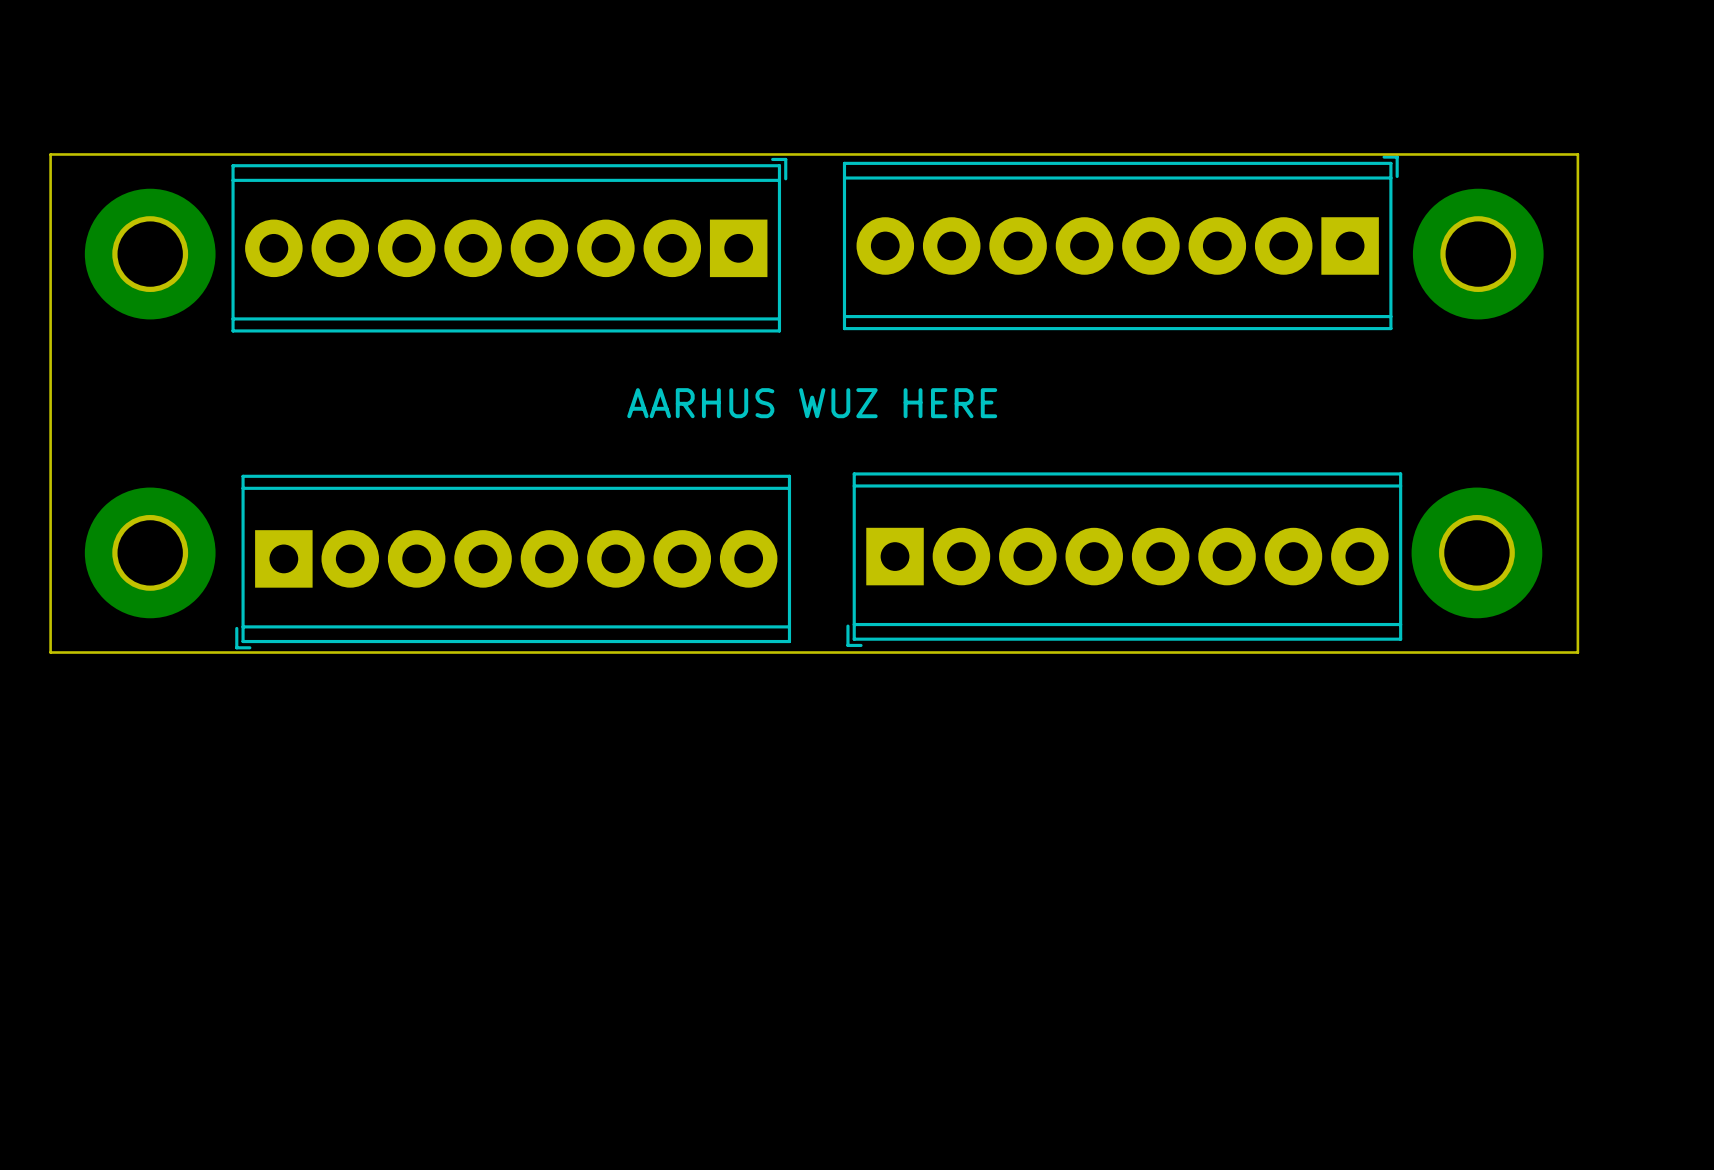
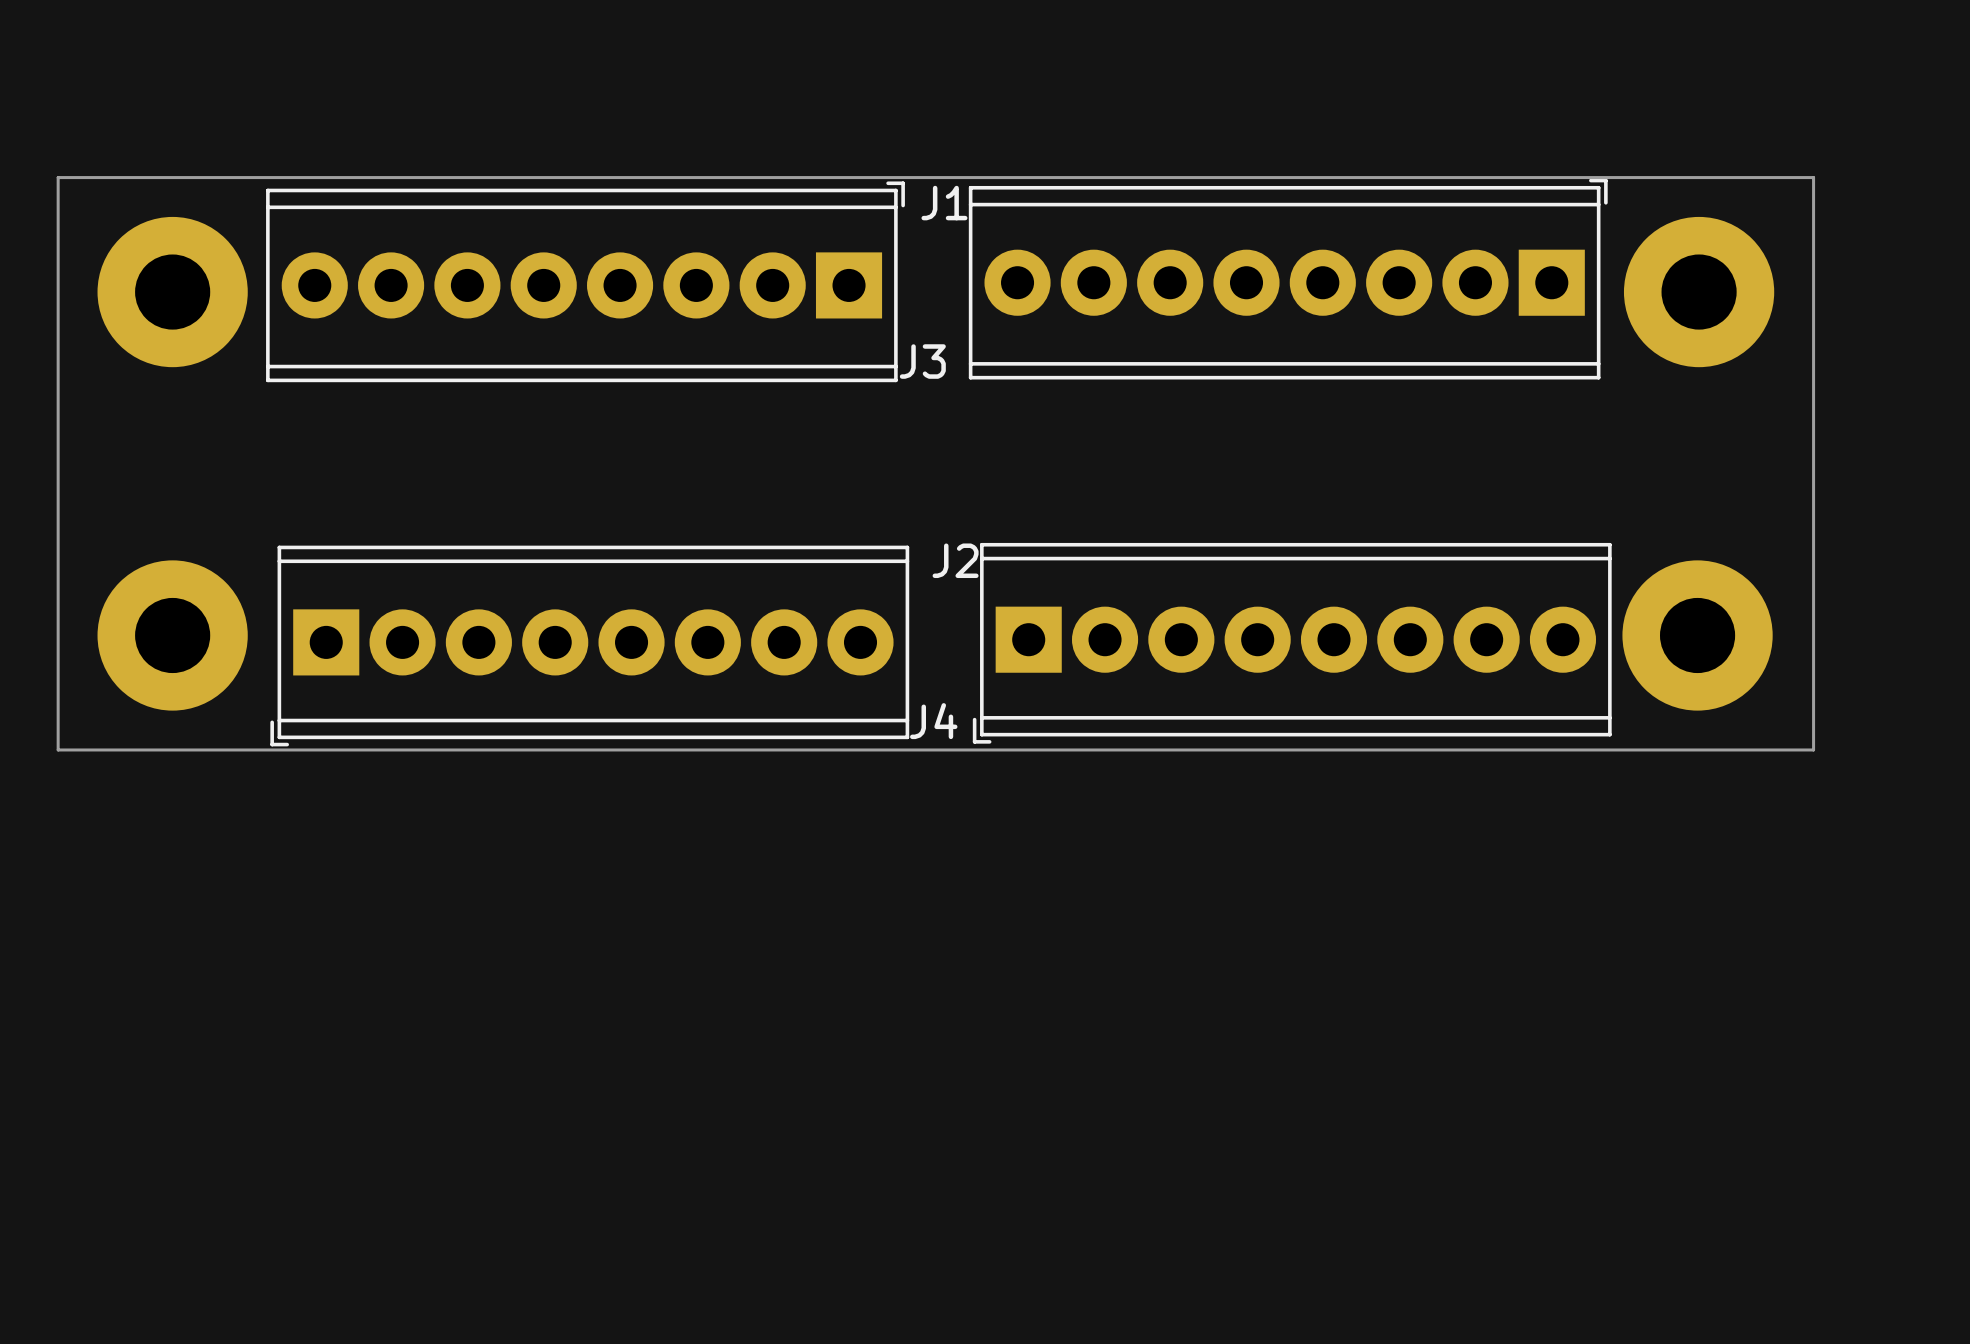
J1 name: none -> J1 (944, 203)
J3 name: none -> J3 (922, 361)
text: AARHUS WUZ HERE (812, 403) -> none
J2 name: none -> J2 (955, 560)
J4 name: none -> J4 (933, 721)

